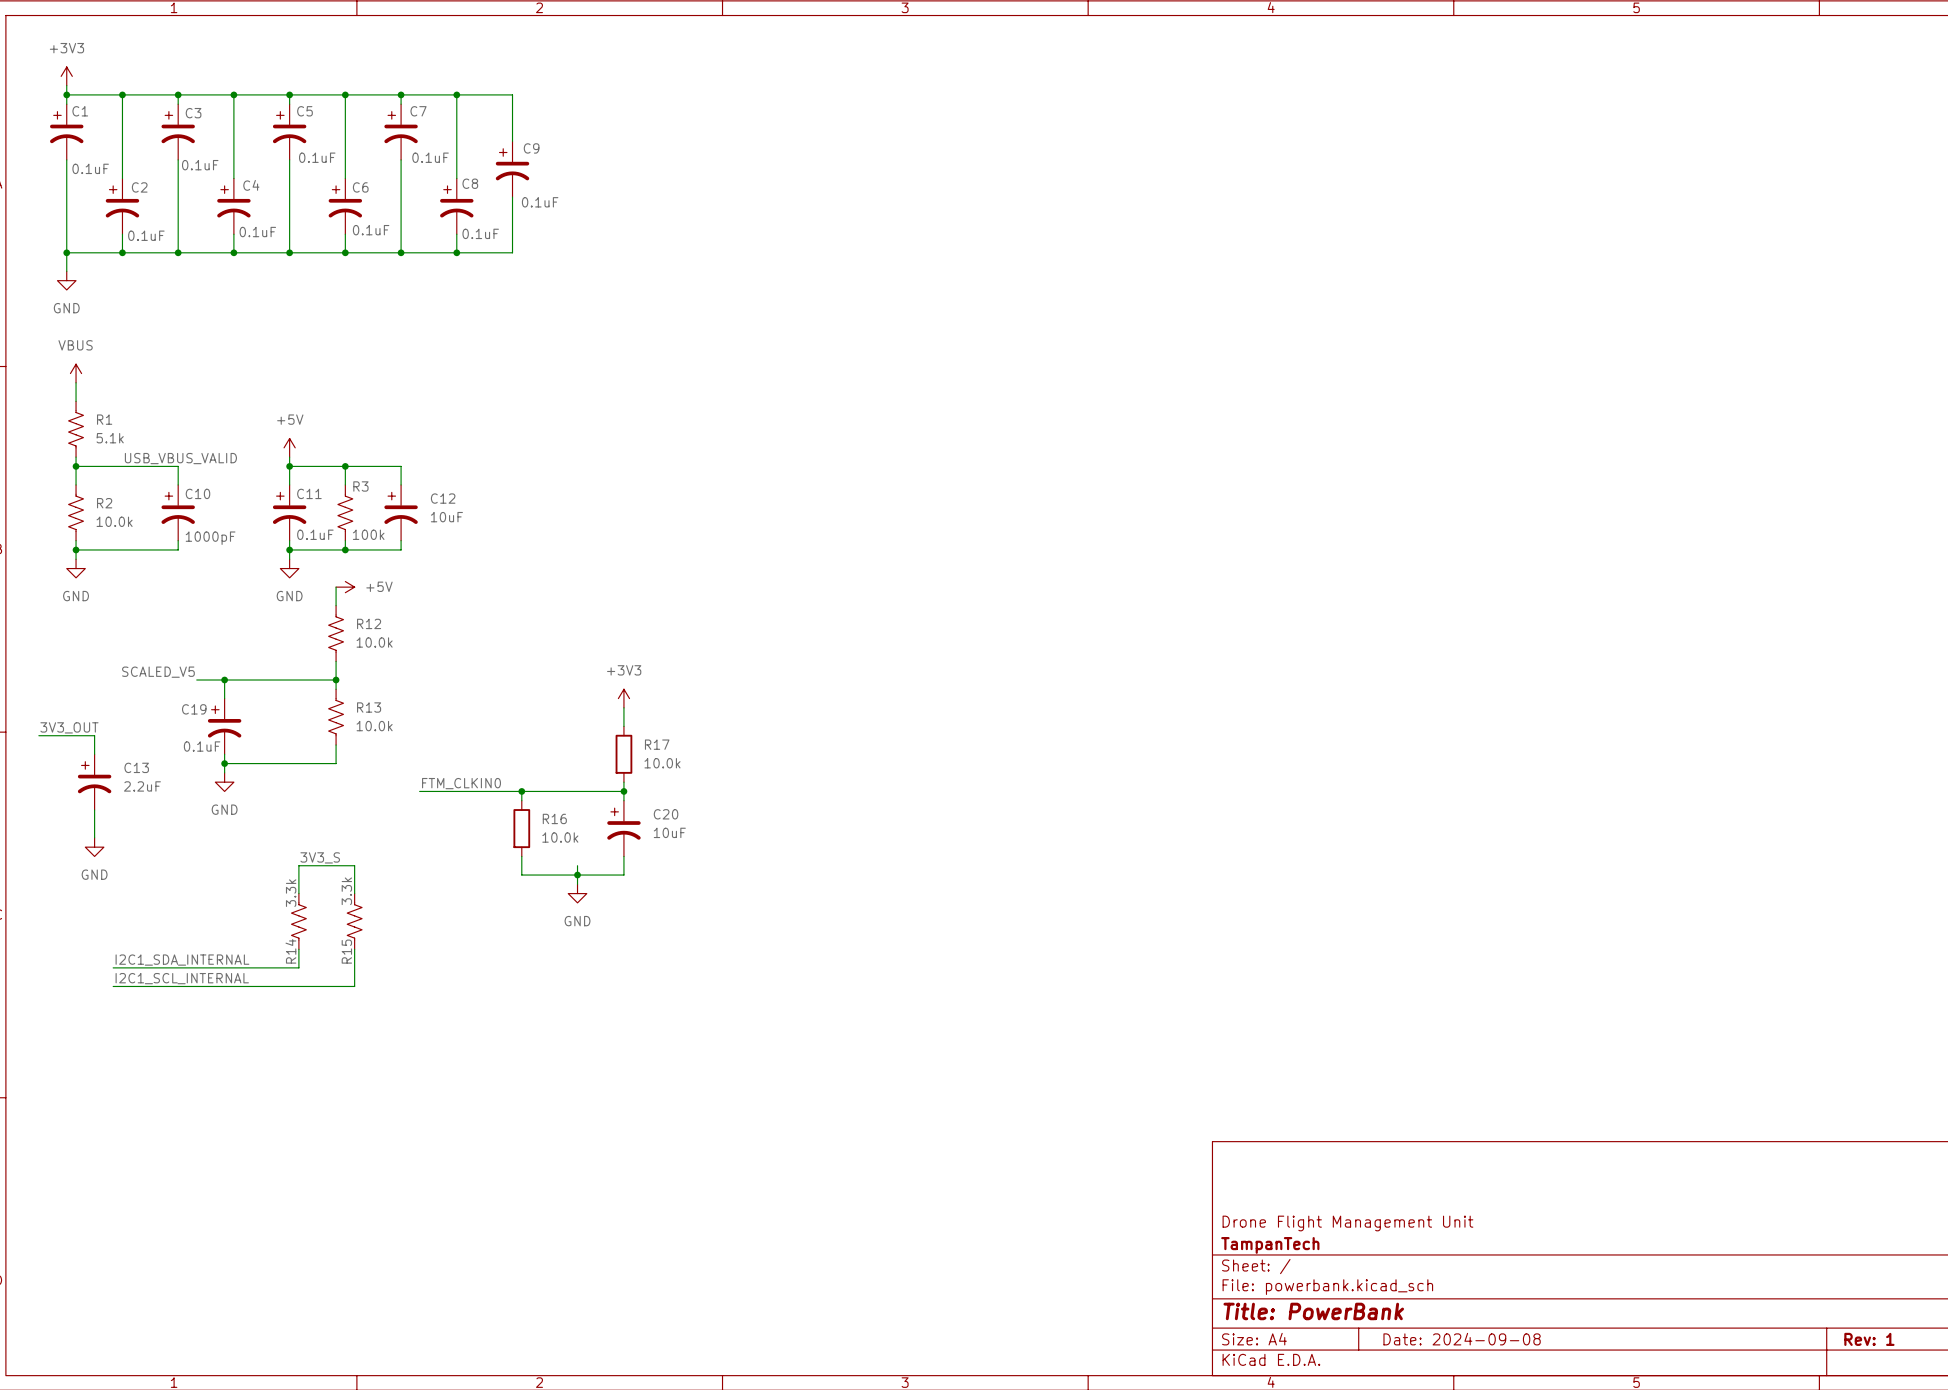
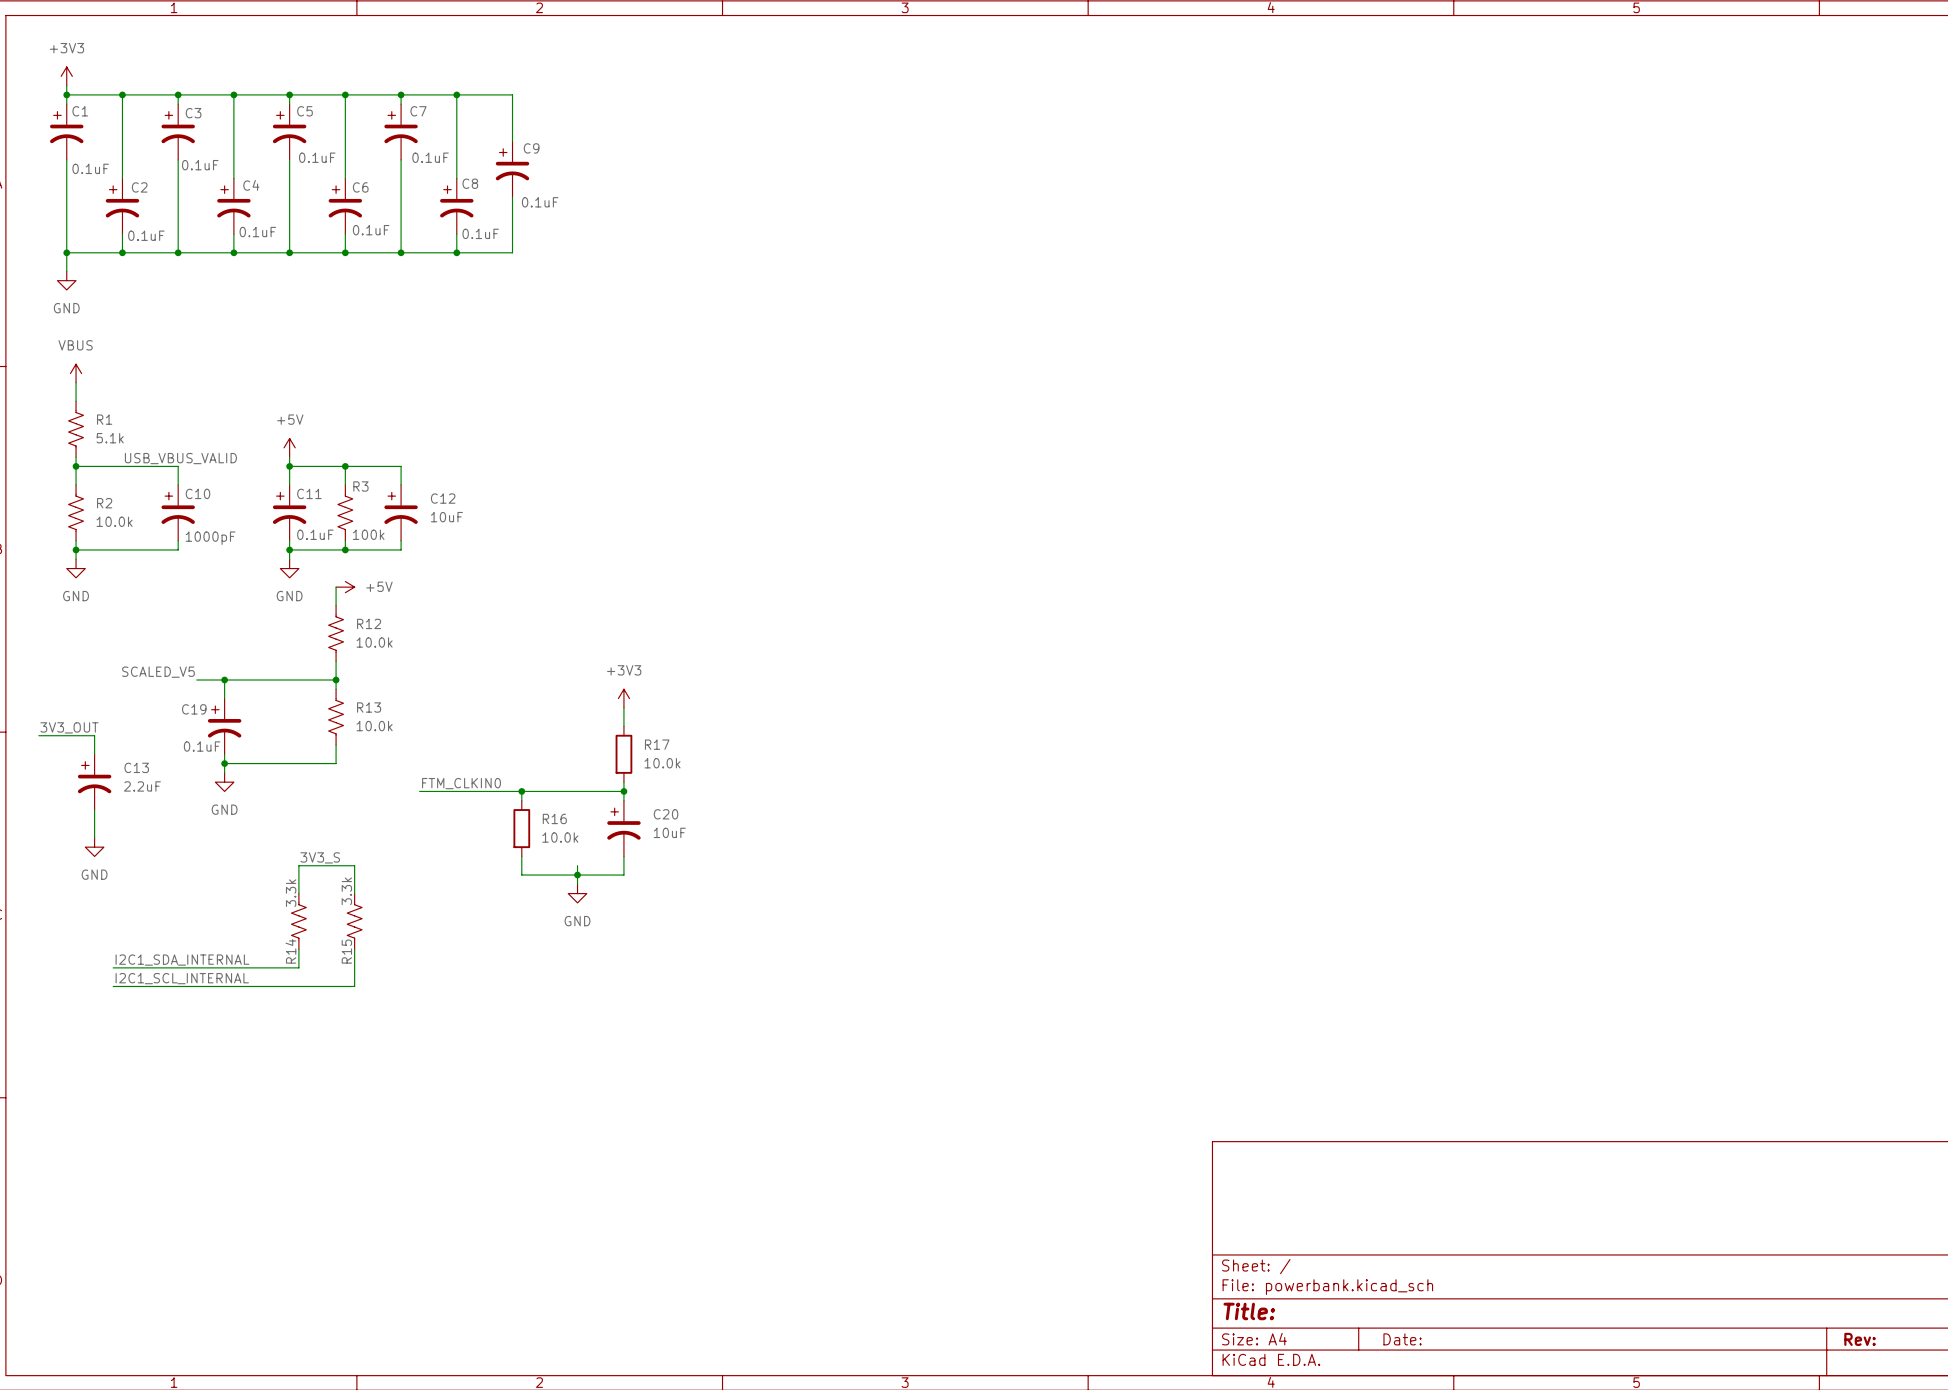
title block: Drone Flight Management Unit (1347, 1223) -> none
title block: TampanTech (1270, 1245) -> none
title block: Title: PowerBank (1313, 1311) -> Title: (1249, 1311)
title block: Date: 2024-09-08 (1462, 1339) -> Date: (1402, 1339)
title block: Rev: 1 (1869, 1339) -> Rev: (1860, 1339)

